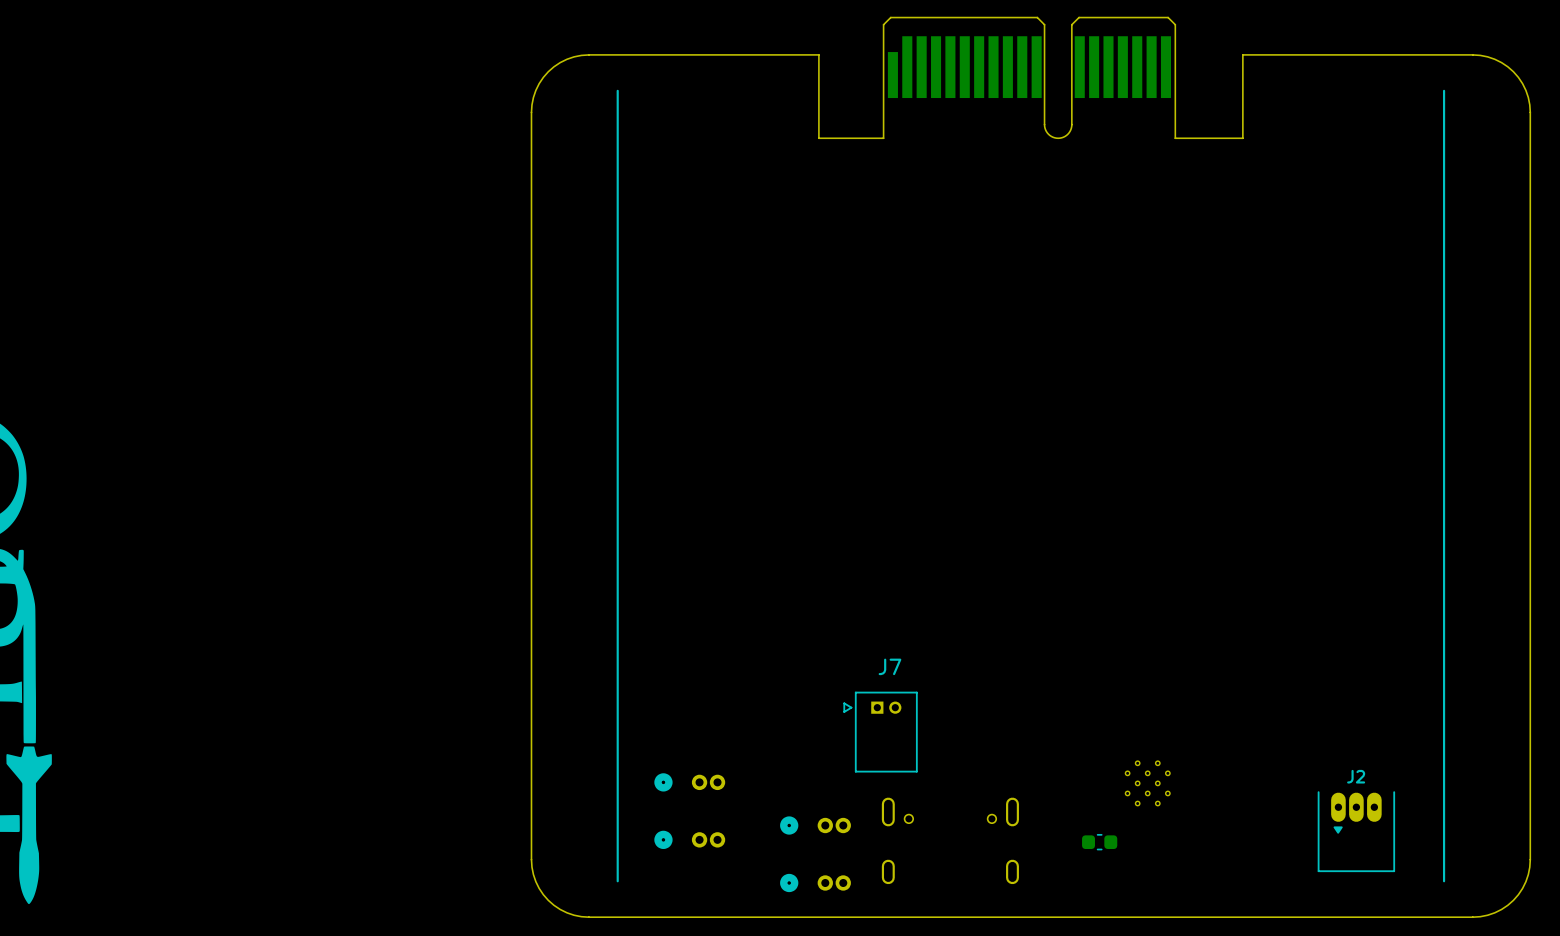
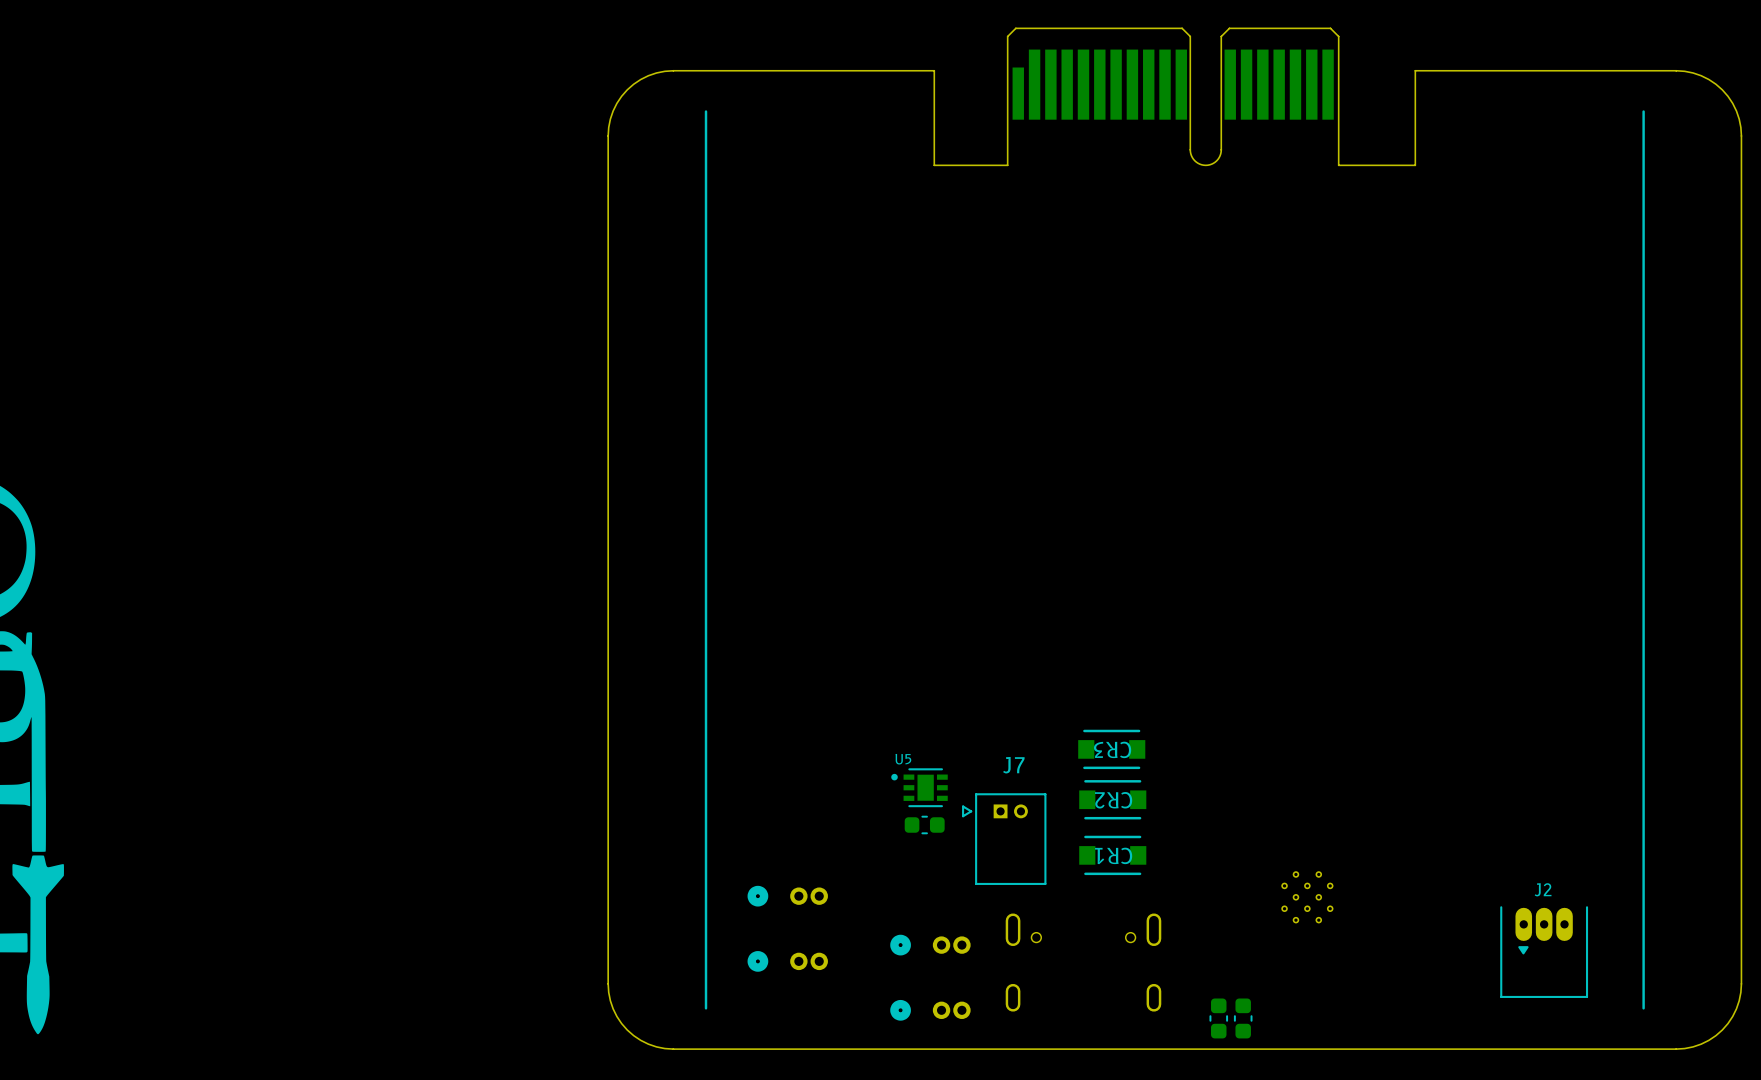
CR3: none -> (1111, 749)
U5: none -> (919, 787)
CR2: none -> (1112, 799)
part: none -> (924, 825)
CR1: none -> (1112, 855)
part: (1099, 842) -> none
part: none -> (1218, 1018)
part: none -> (1243, 1018)

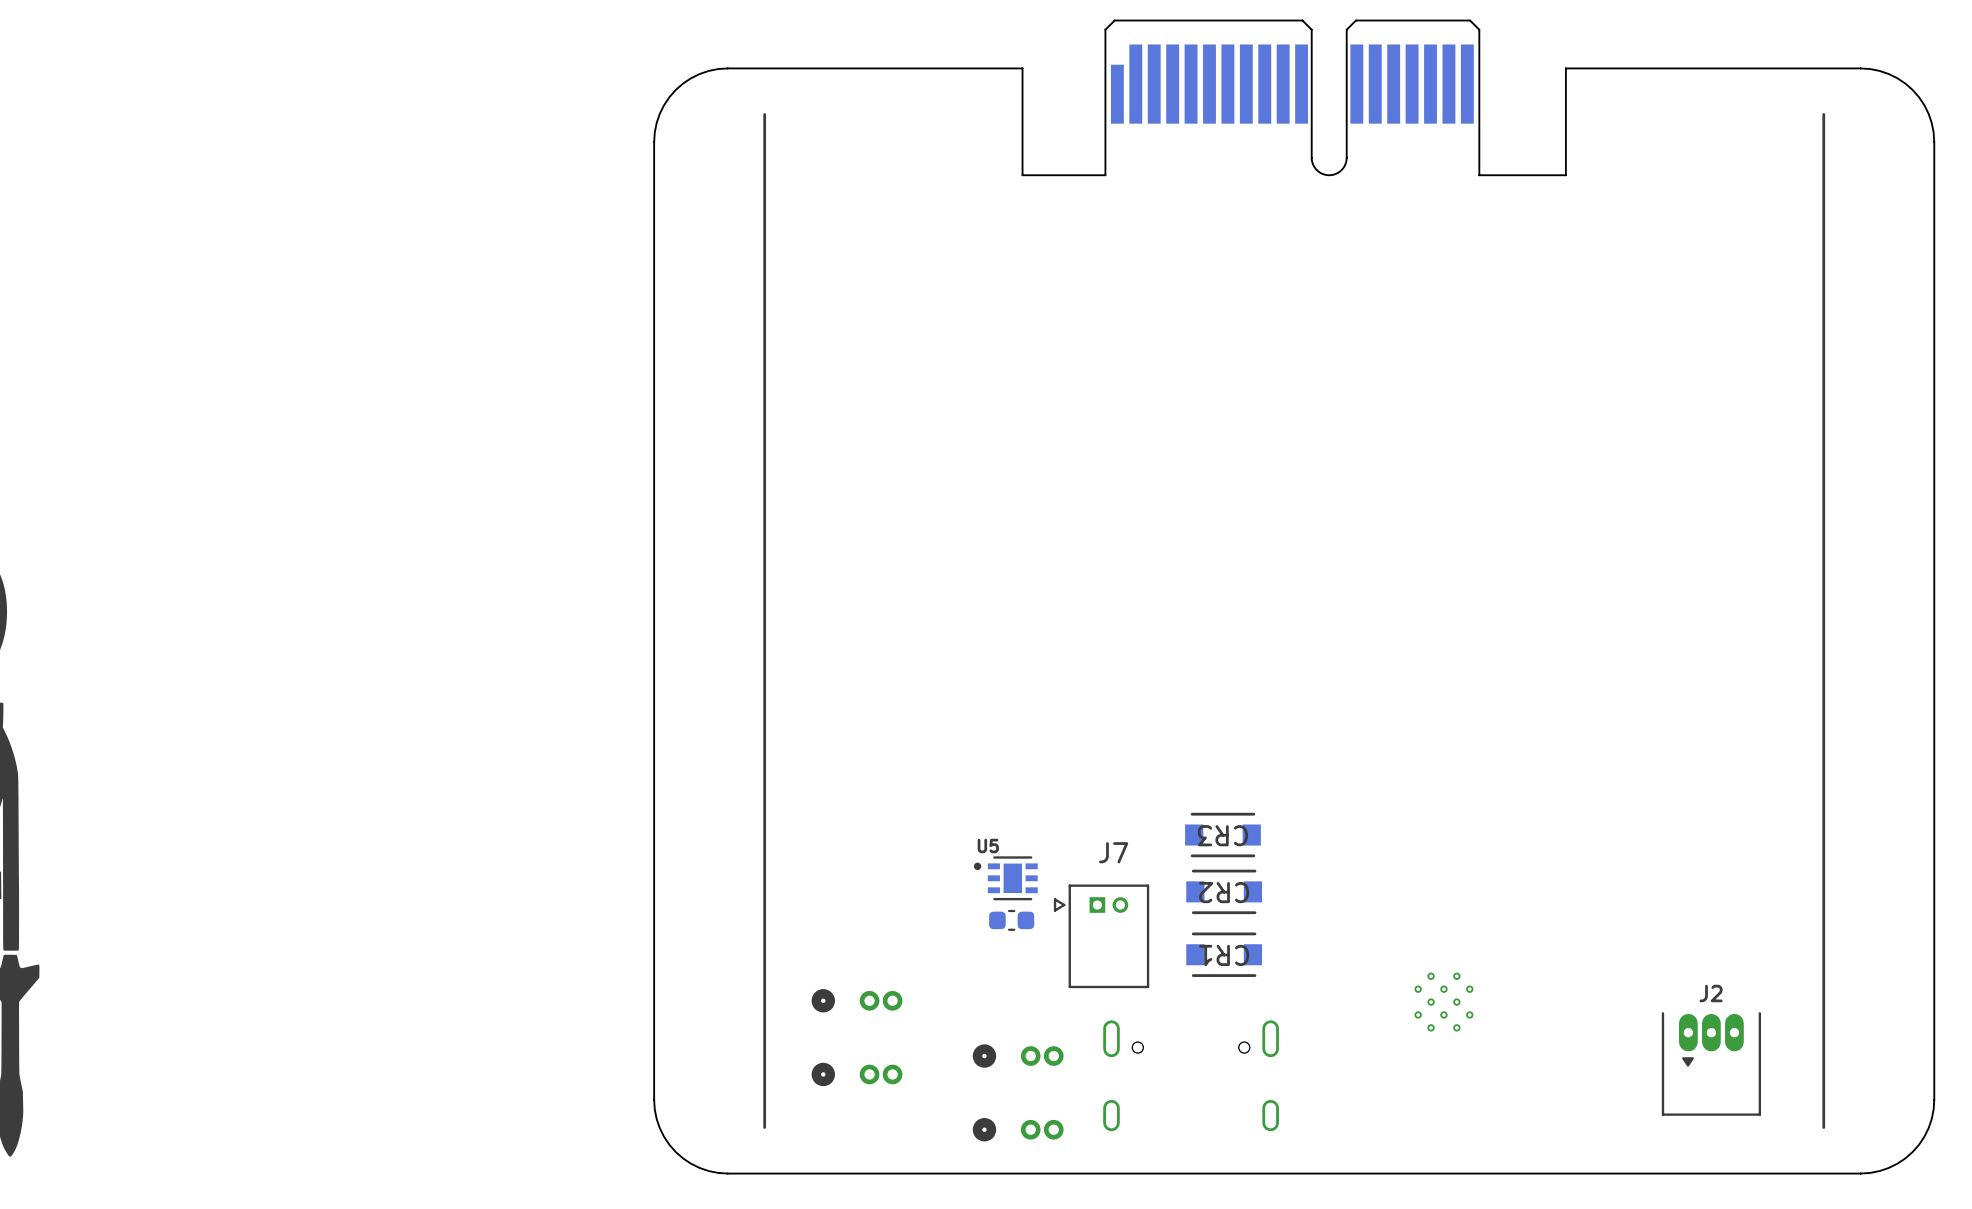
part: (1218, 1018) -> none
part: (1243, 1018) -> none

